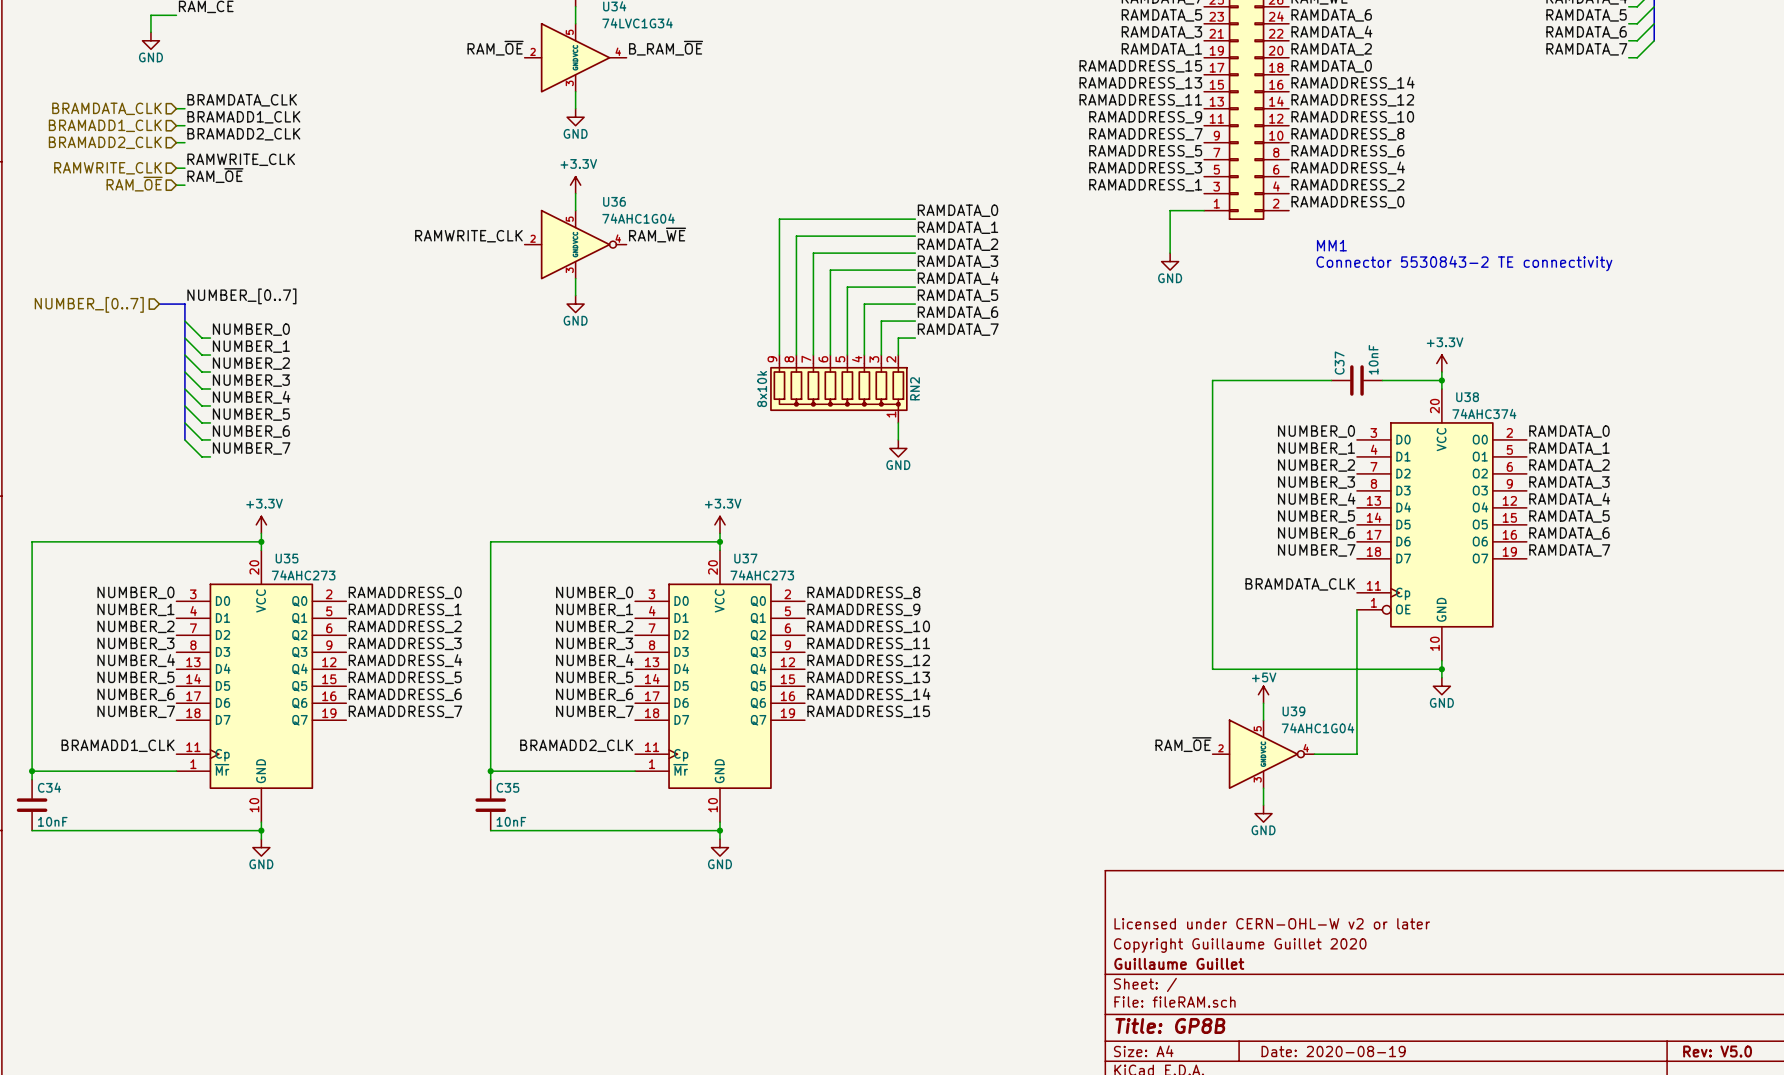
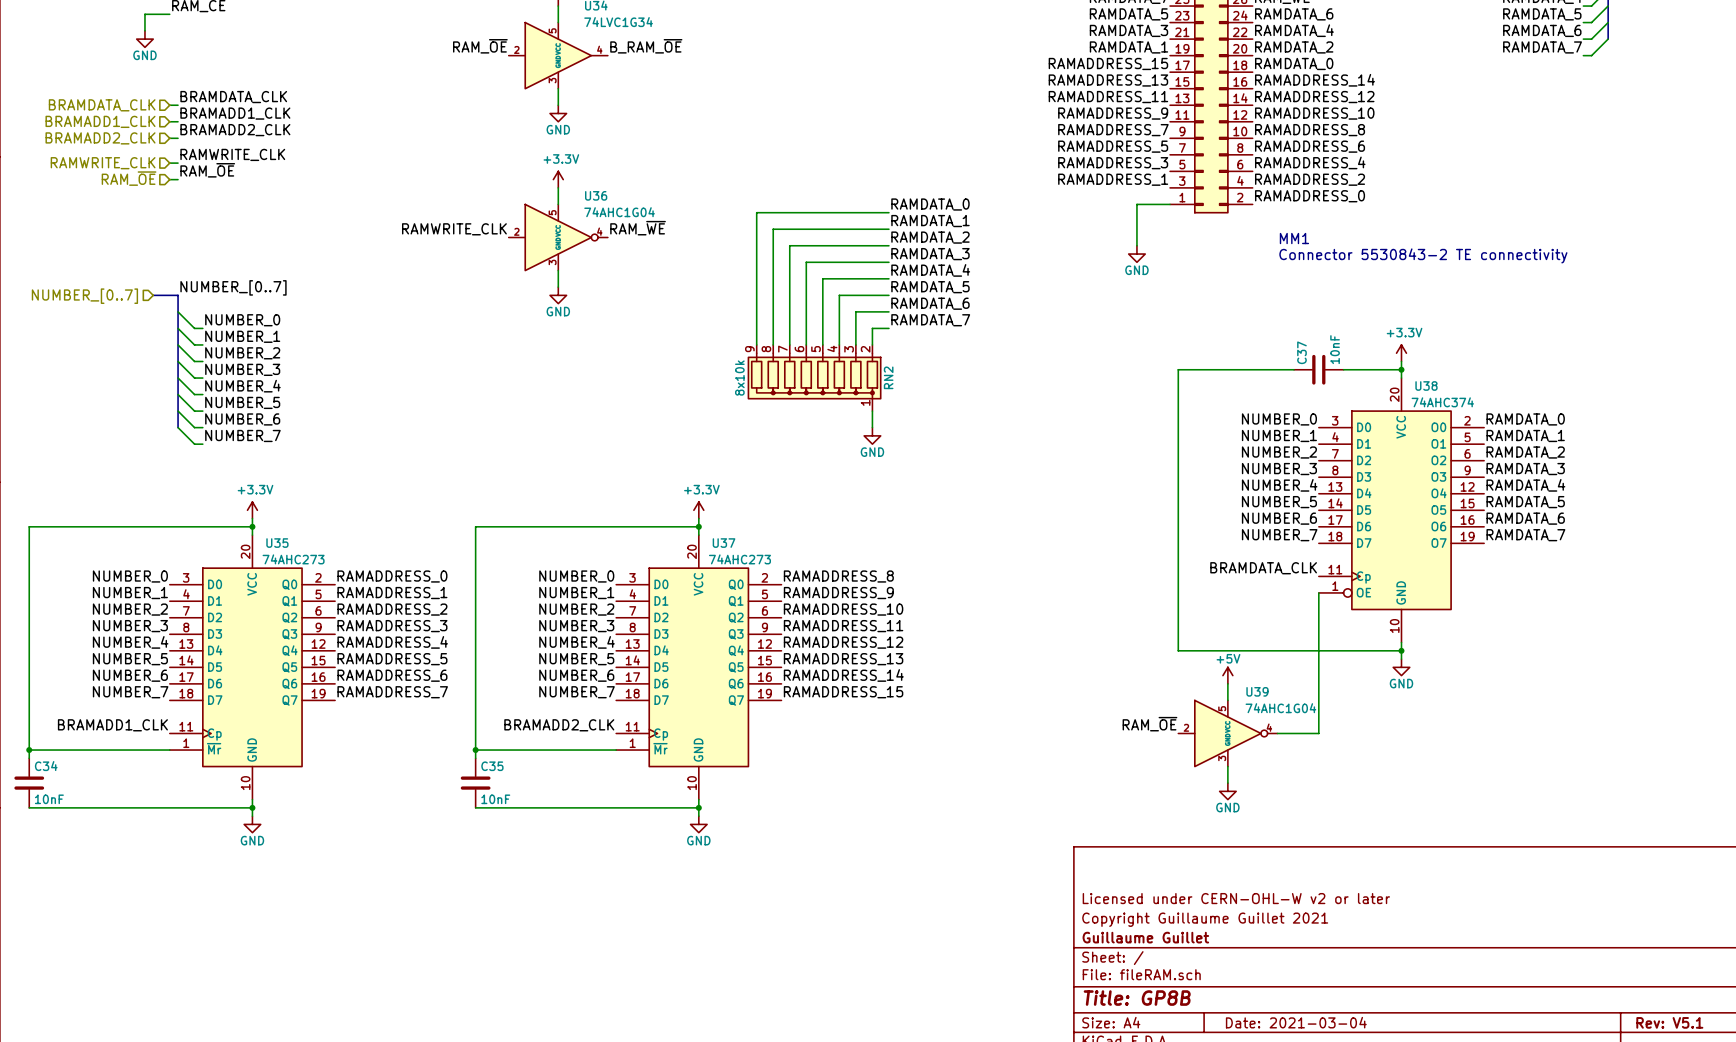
title block: Copyright Guillaume Guillet 2020 (1240, 945) -> Copyright Guillaume Guillet 2021 (1205, 919)
title block: Date: 2020-08-19 (1333, 1051) -> Date: 2021-03-04 (1296, 1022)
title block: Rev: V5.0 (1717, 1051) -> Rev: V5.1 (1669, 1022)

